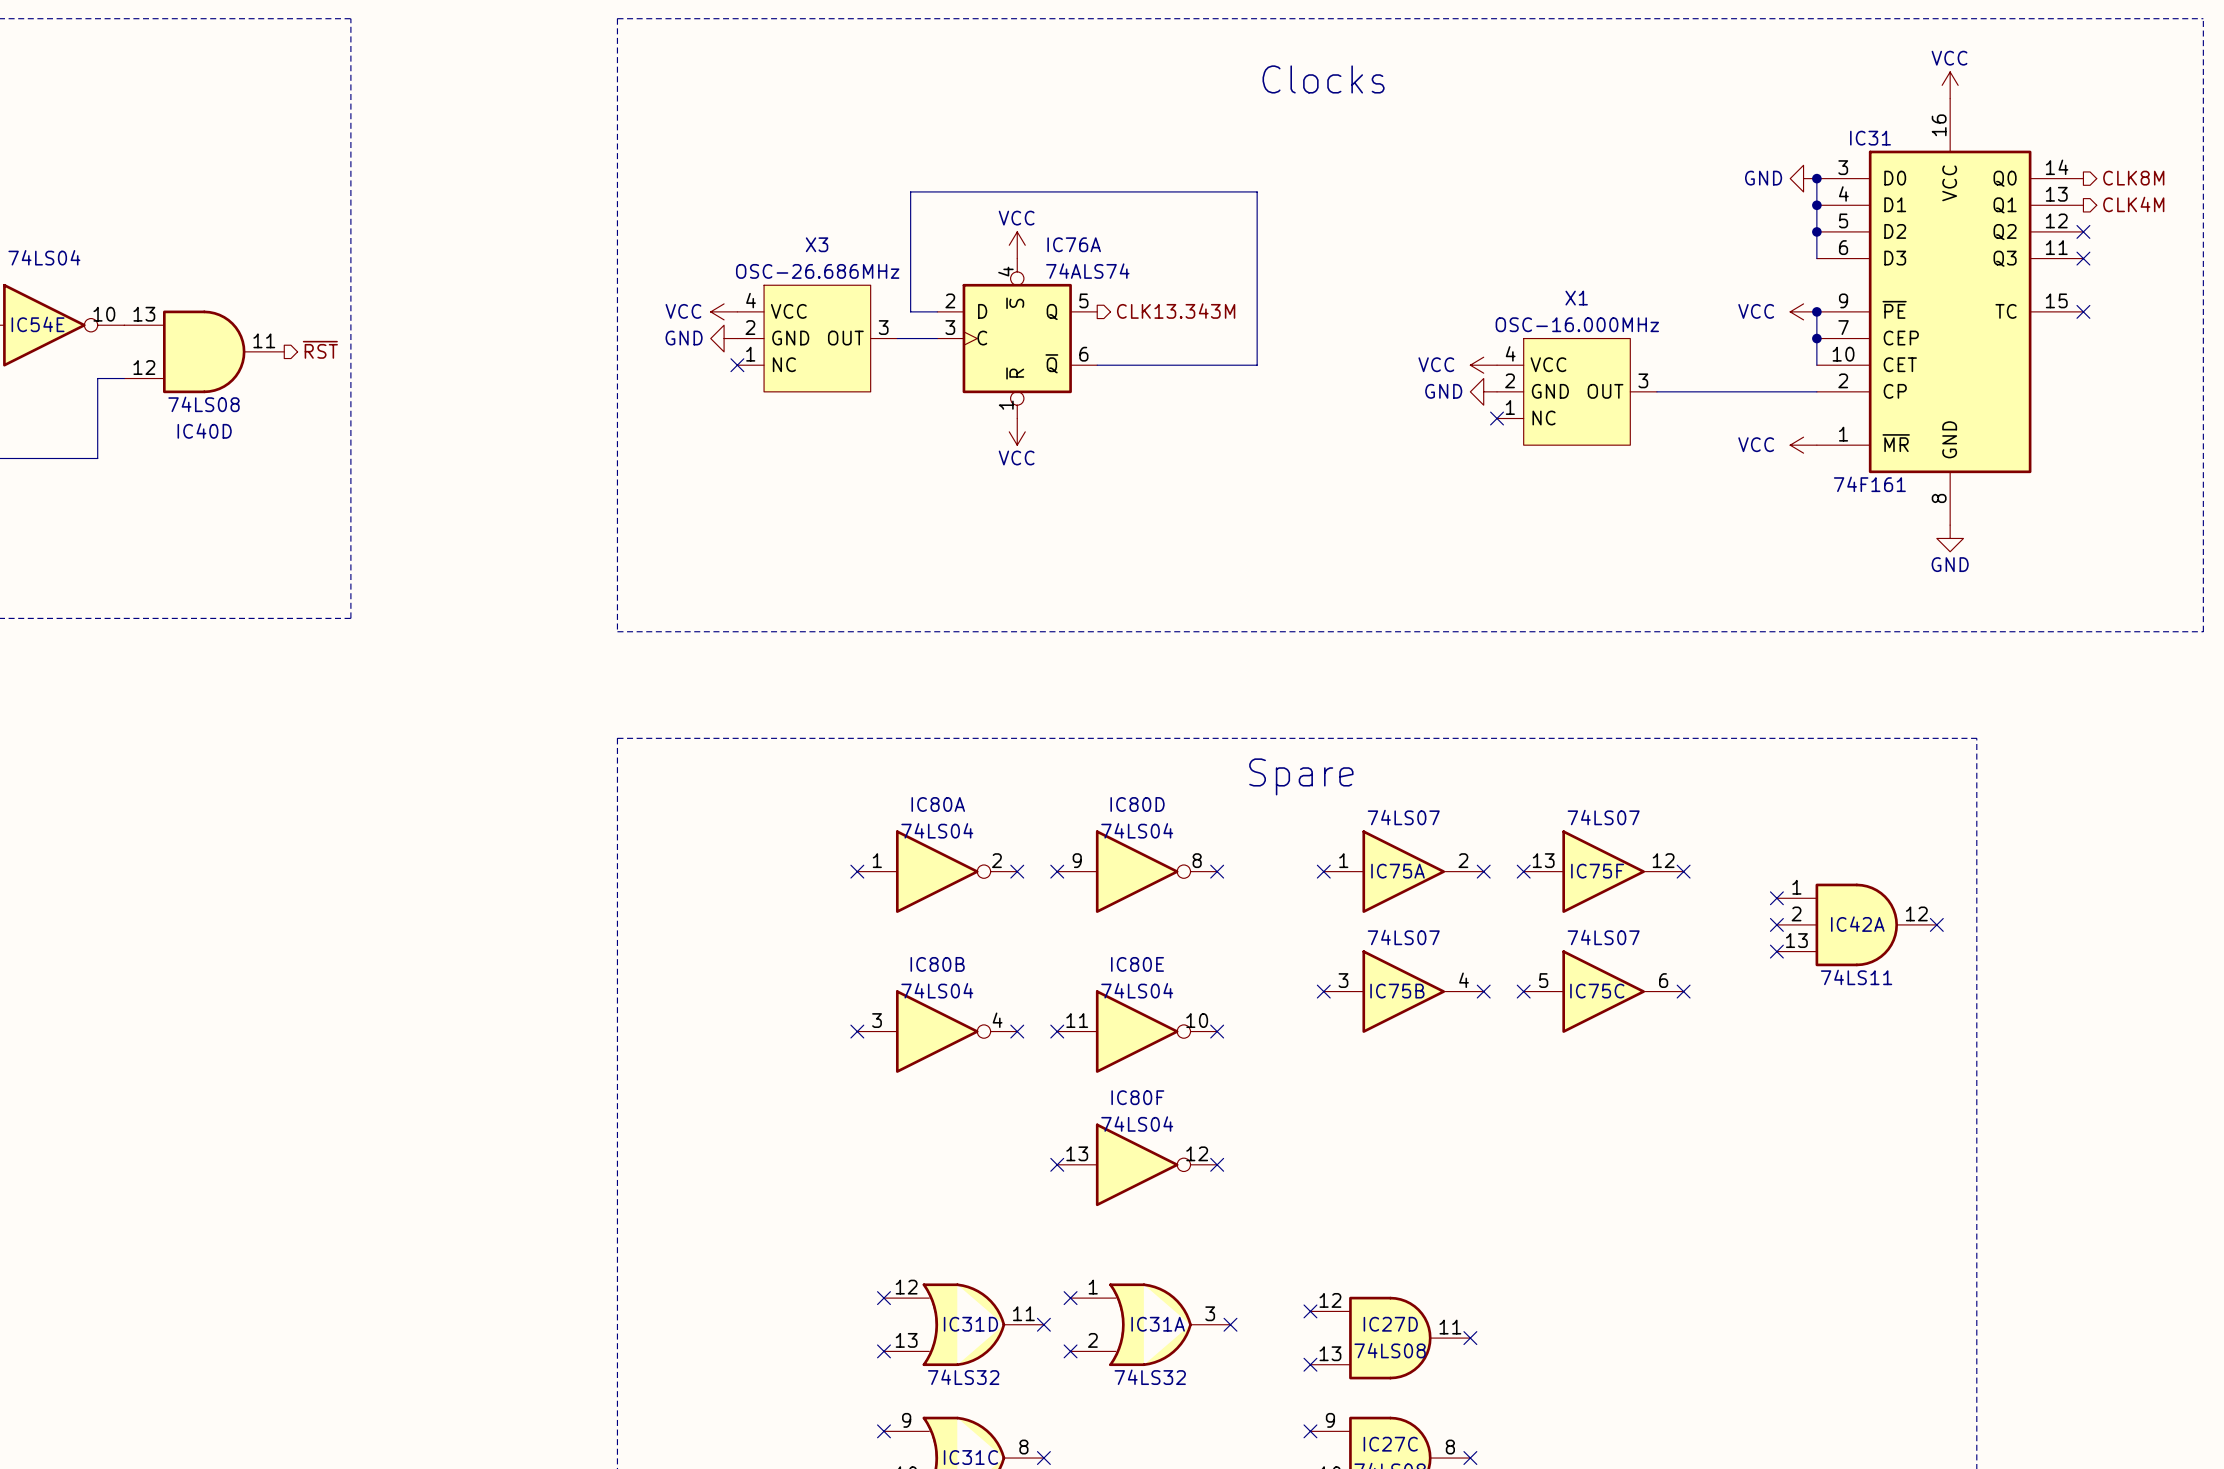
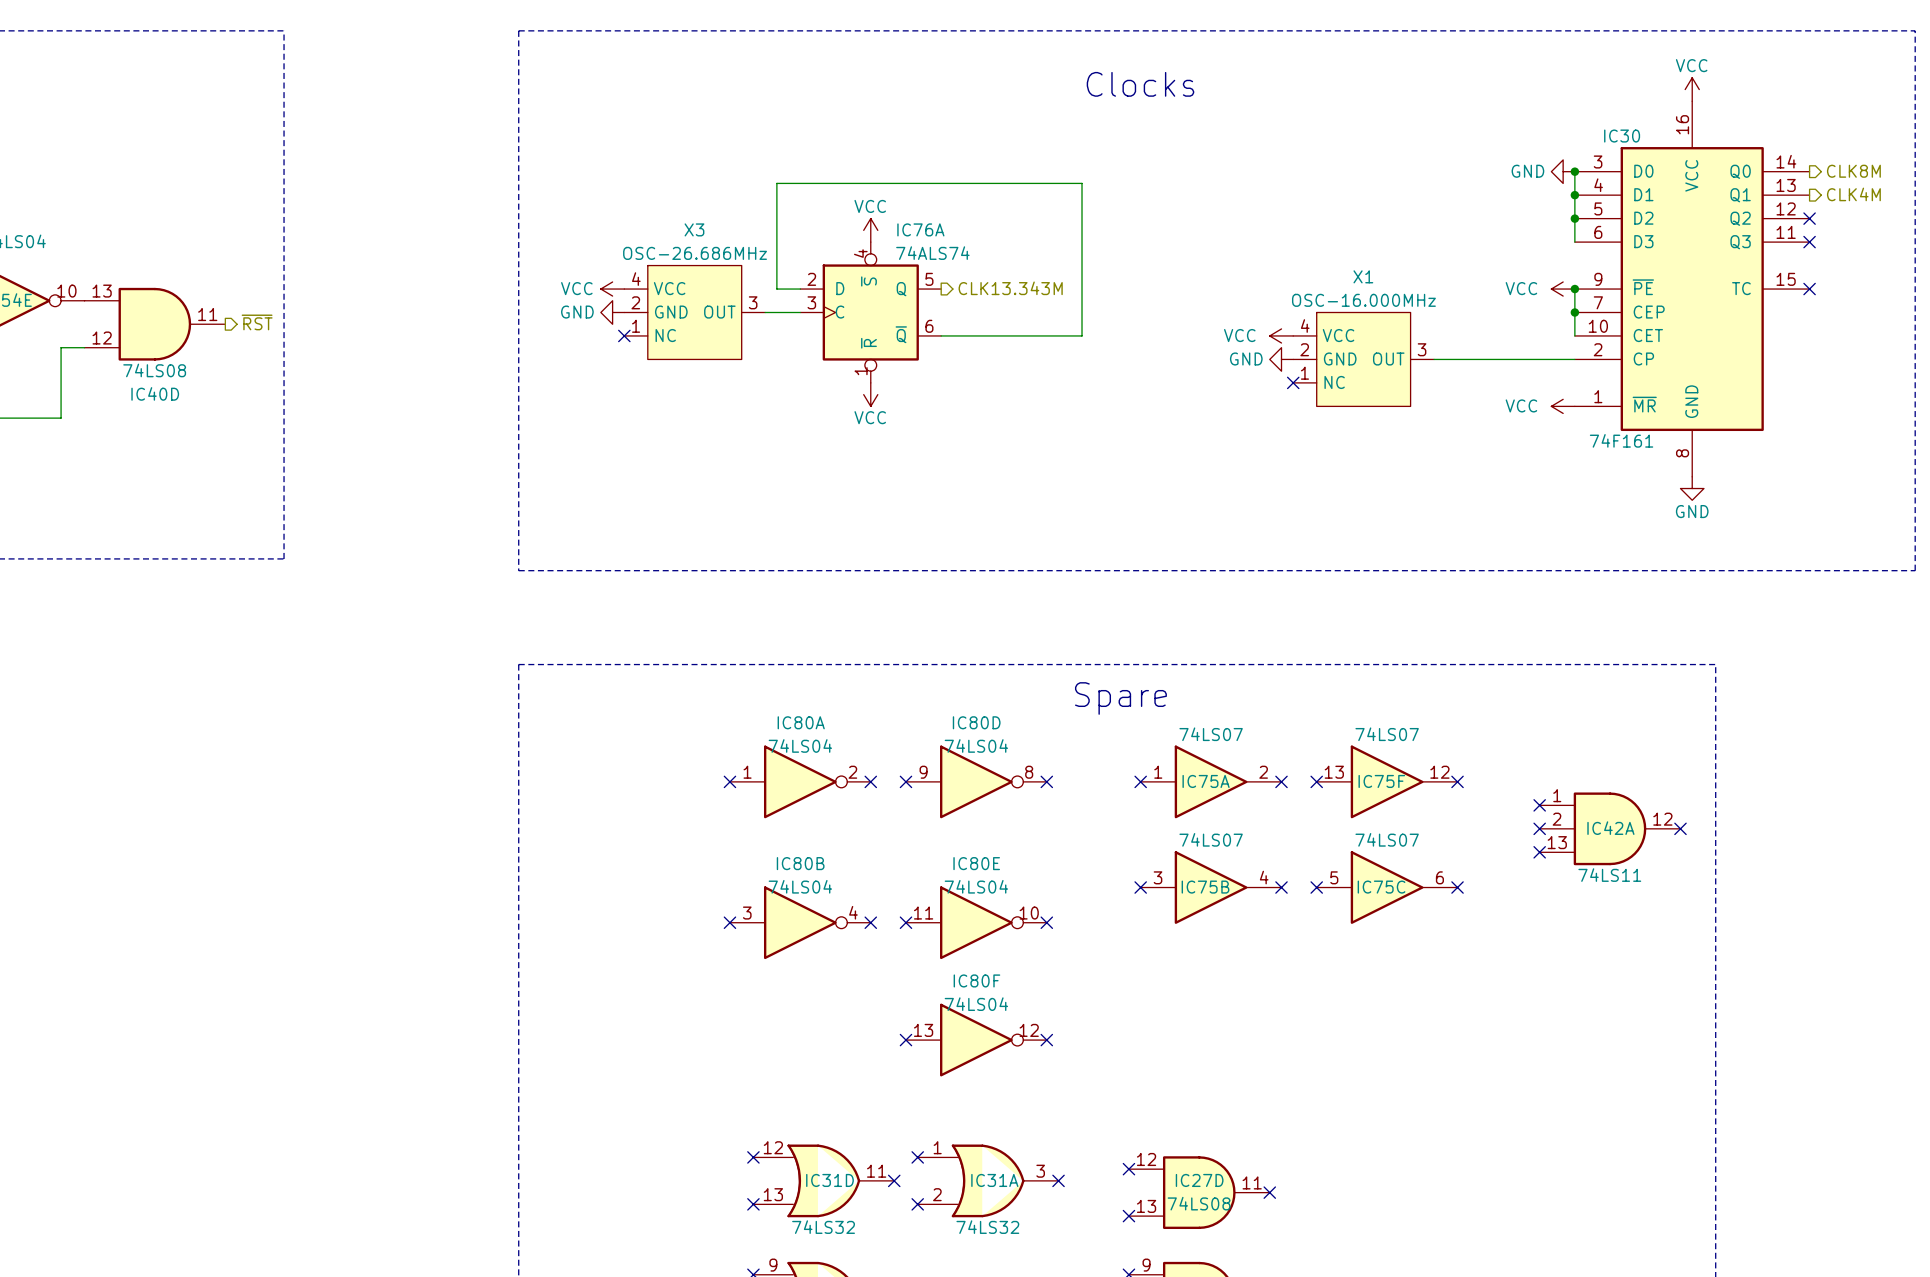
IC31 name: IC31 (1870, 138) -> IC30 (1622, 136)

